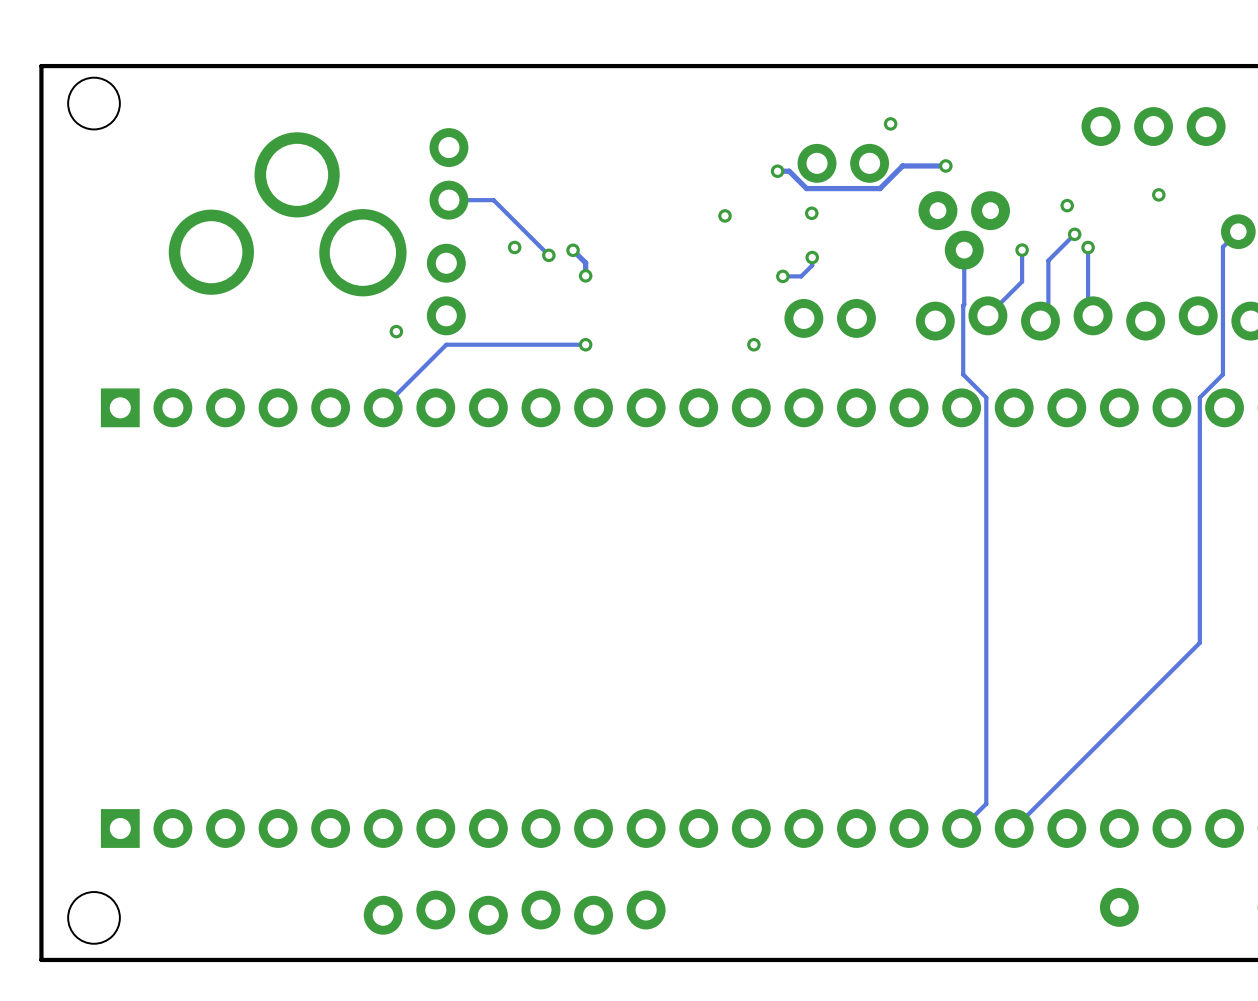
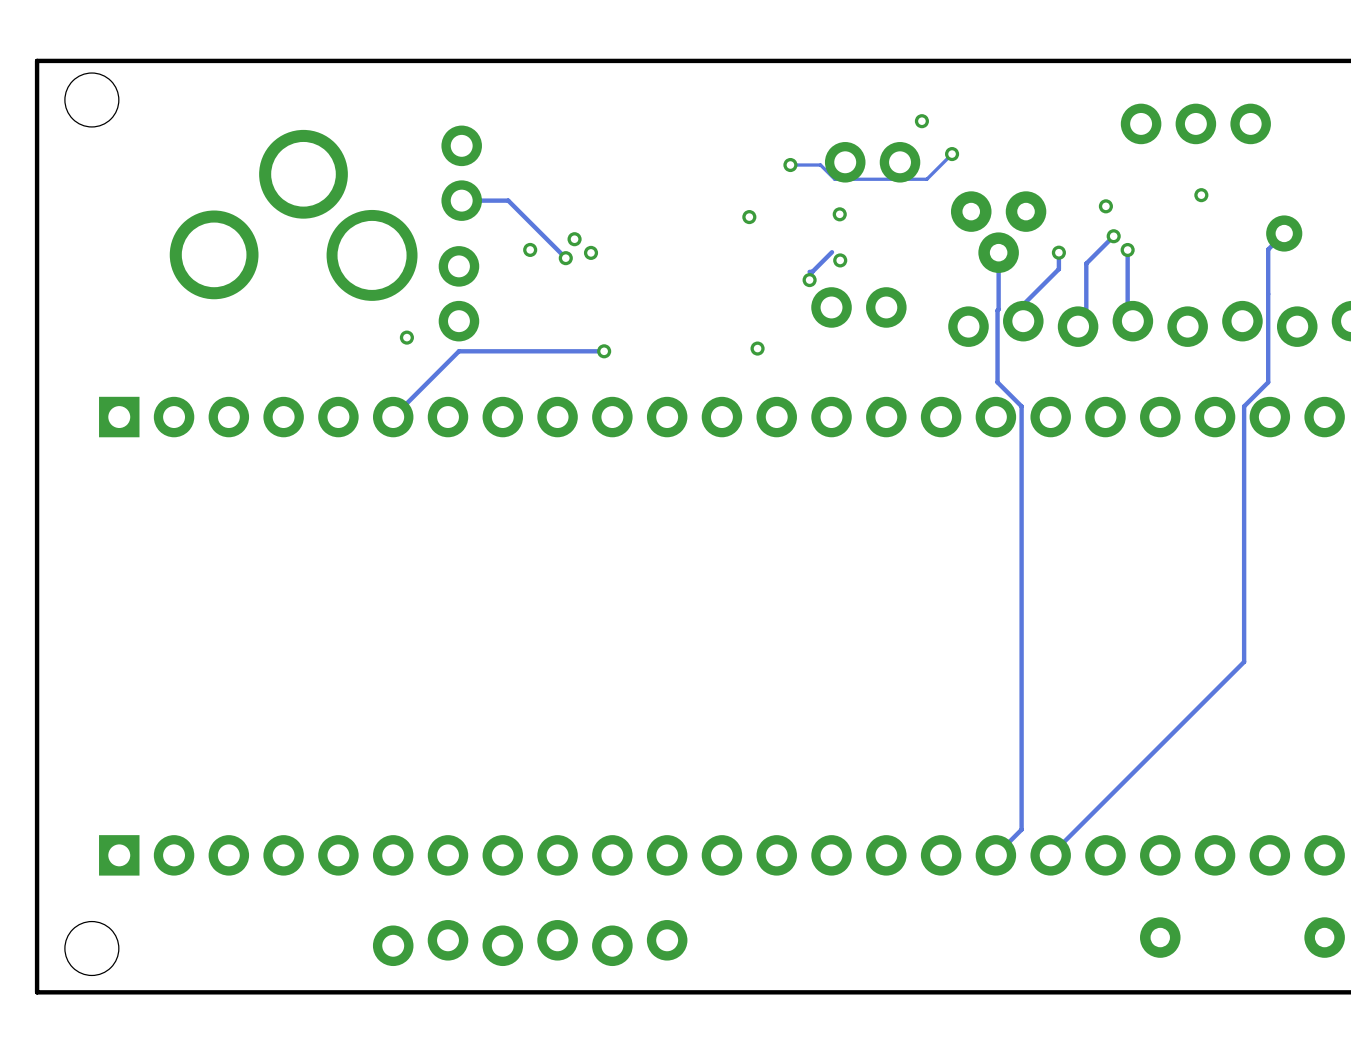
track: none -> (952, 154) (926, 179) (834, 179) (820, 165) (790, 165)
track: (945, 165) (902, 165) (880, 188) (806, 188) (789, 171) (777, 171) -> none
via position: (945, 165) -> (952, 154)
via position: (777, 171) -> (790, 165)
track: none -> (832, 252) (812, 271) (809, 271)
track: (573, 250) (585, 262) (585, 275) -> none
track: (812, 257) (812, 265) (801, 276) (782, 276) -> none
track: (1022, 265) (1022, 281) (987, 315) -> (1058, 269) (1023, 304)
via position: (585, 275) -> (574, 239)
part position: (830, 318) -> (858, 307)
via position: (753, 344) -> (757, 348)

